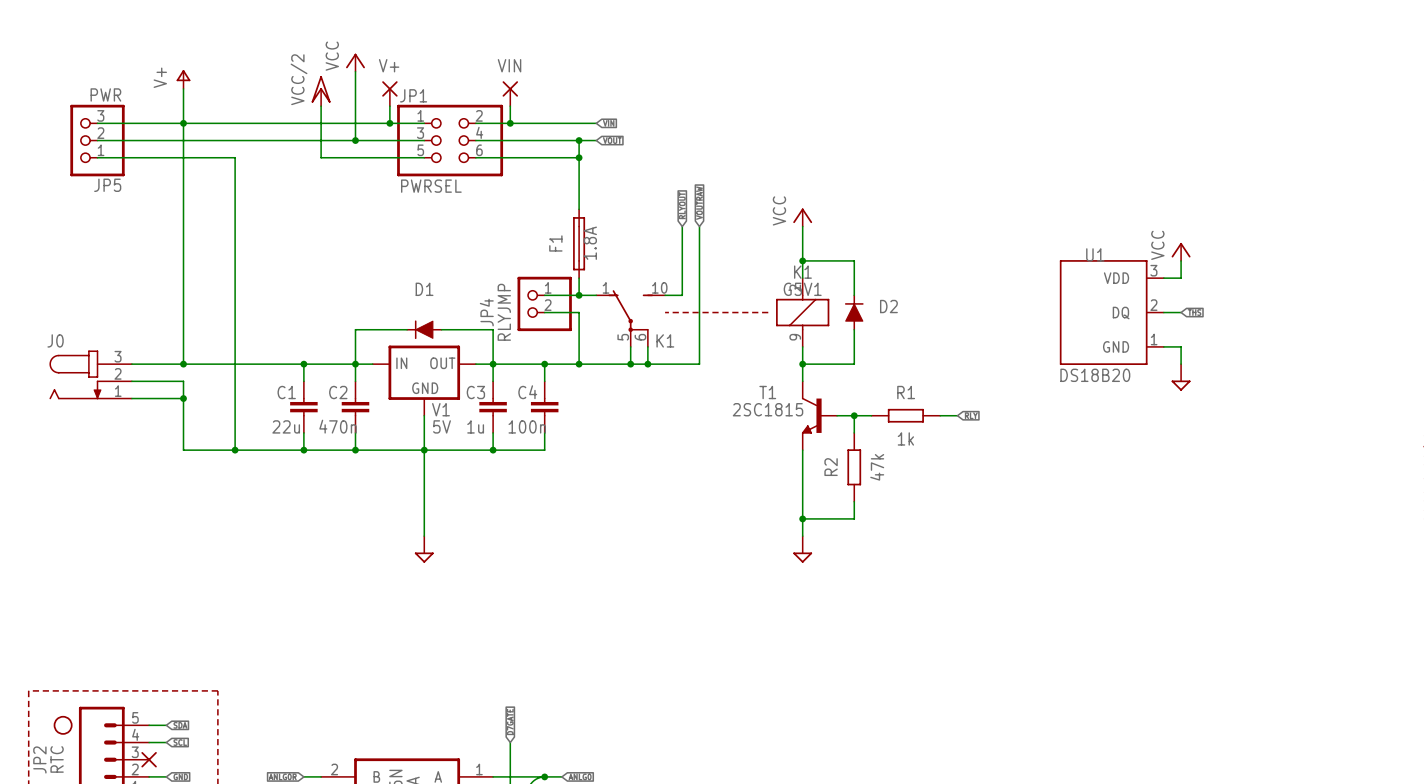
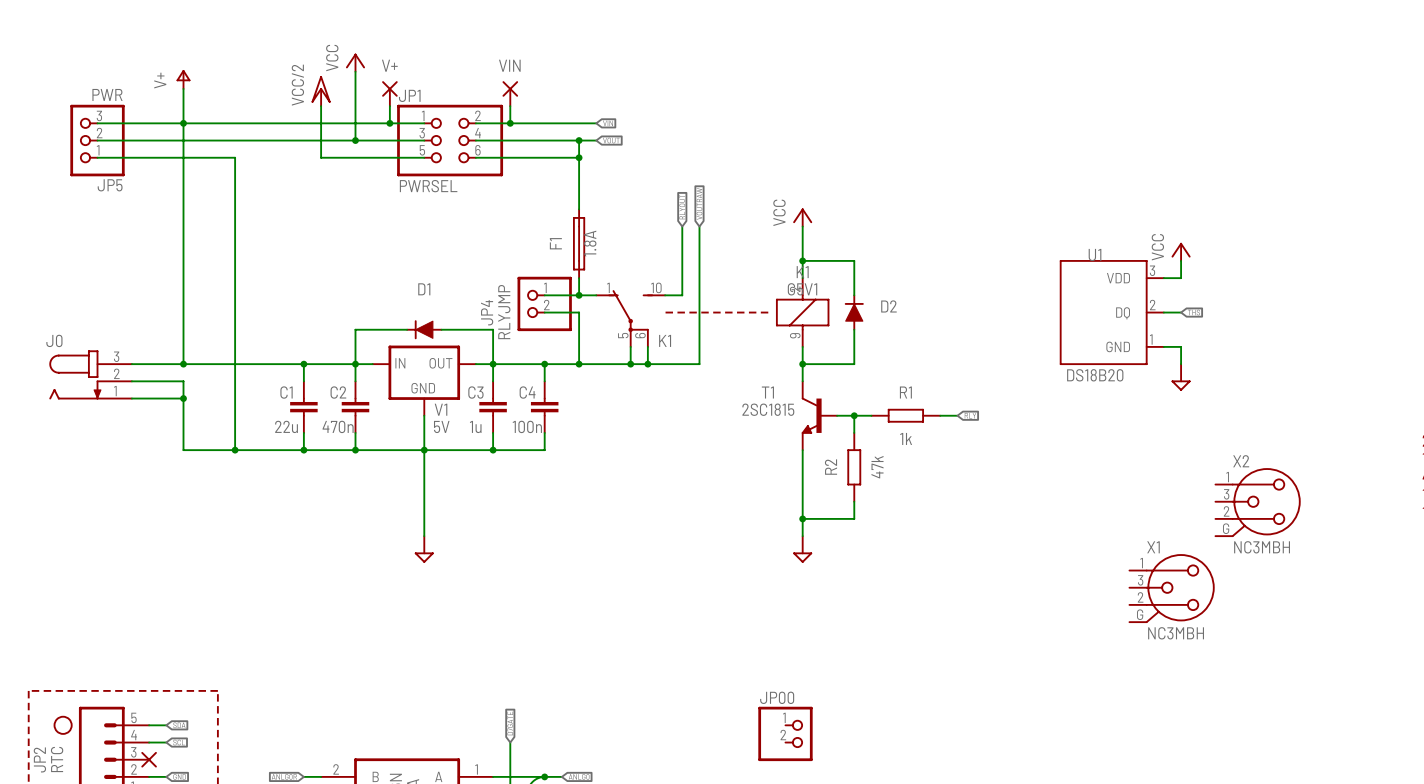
X2: none -> NC3MBH (1258, 502)
X1: none -> NC3MBH (1172, 588)
JP00: none -> (785, 733)

